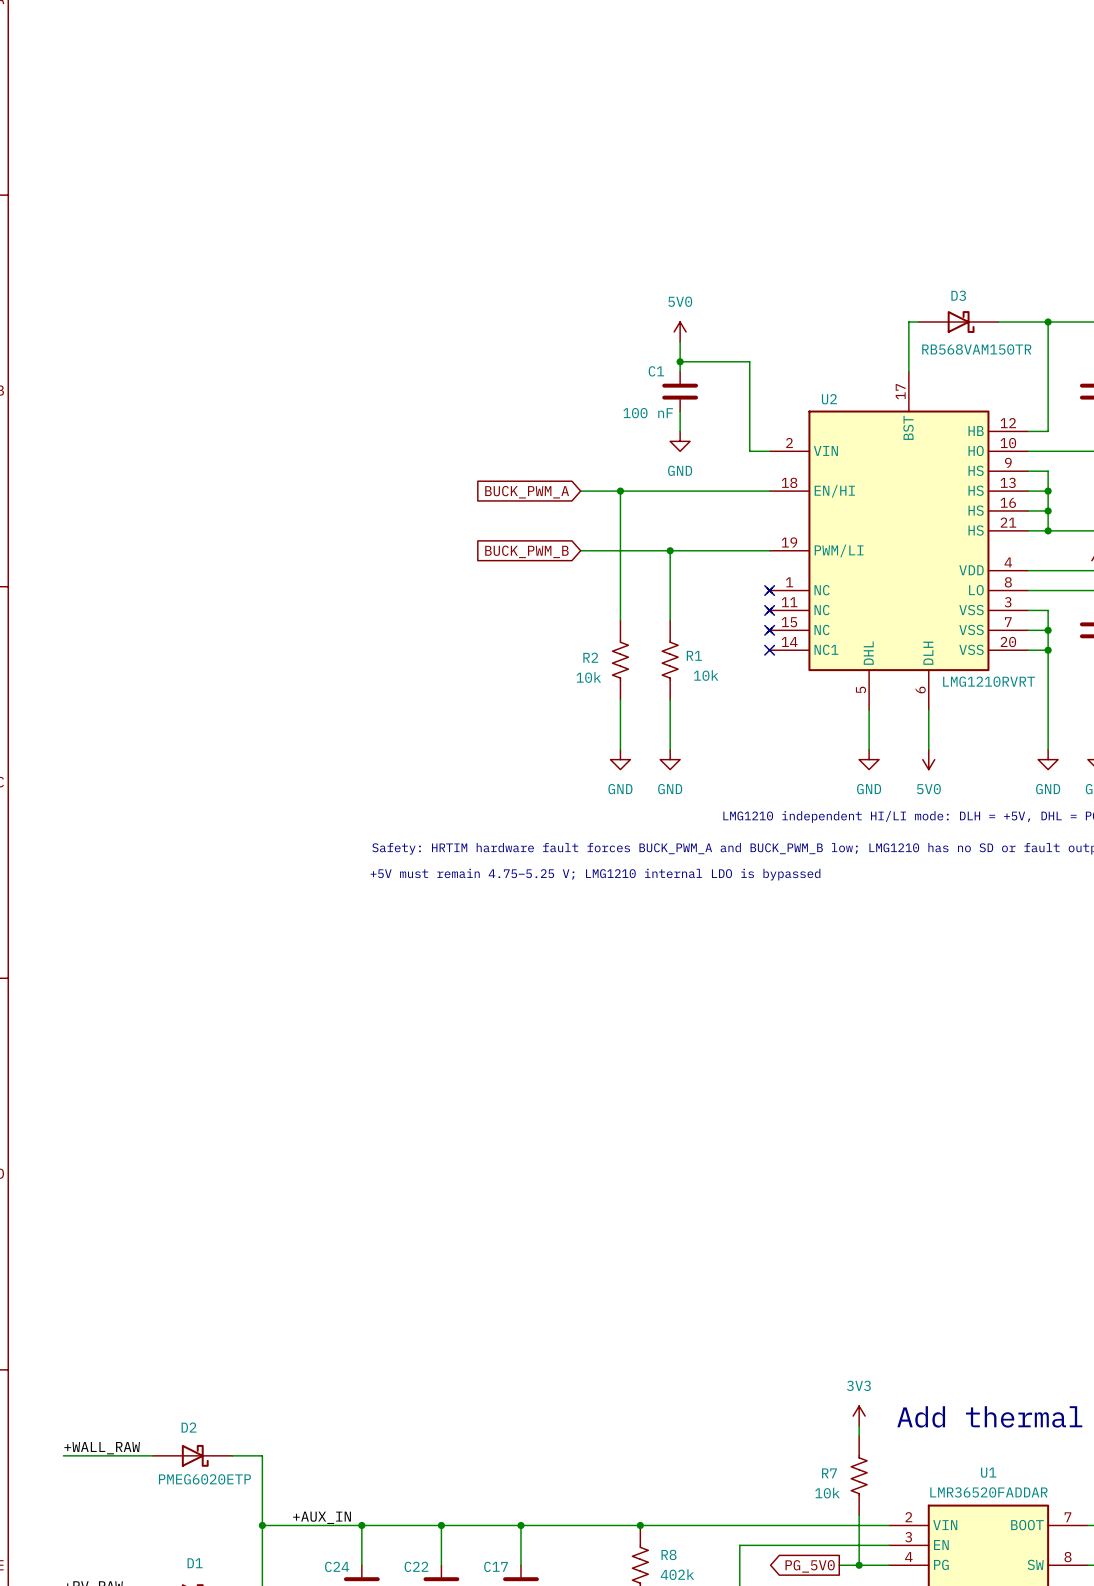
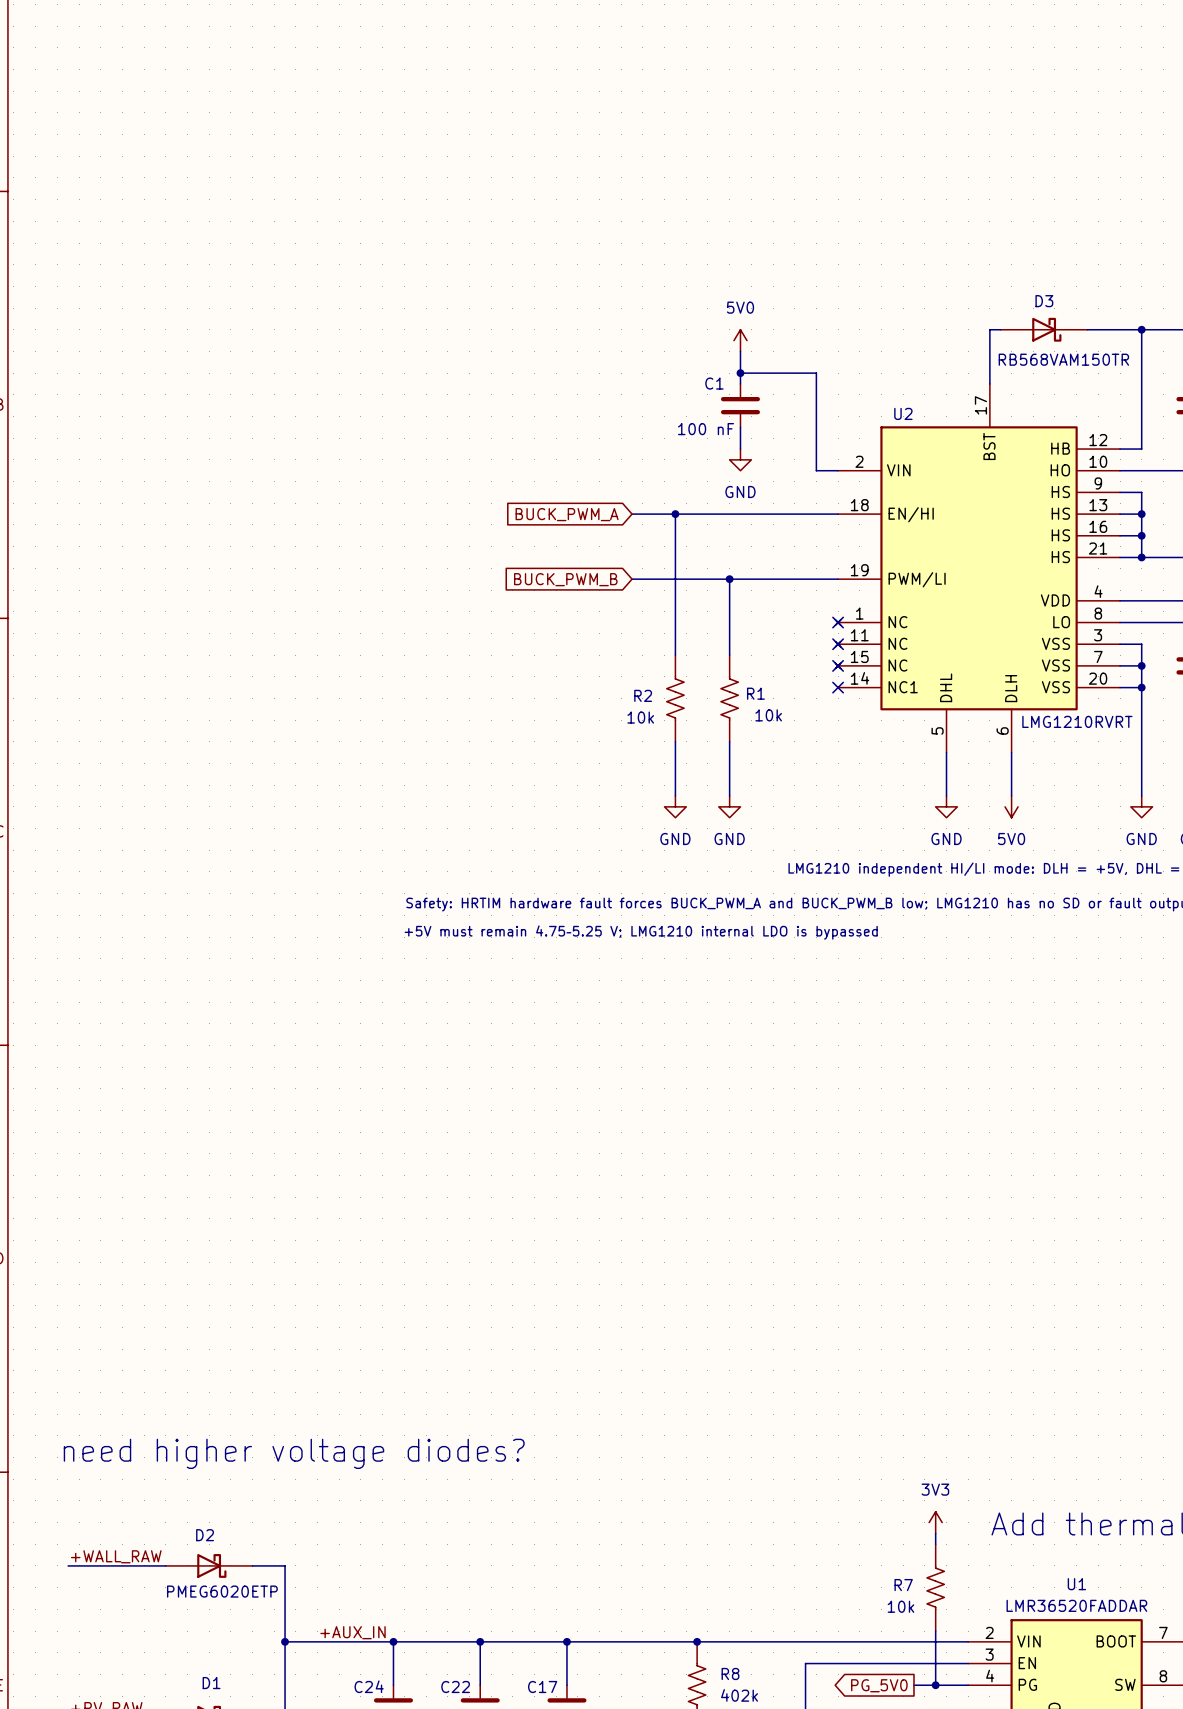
text: none -> need higher voltage diodes? (294, 1453)

